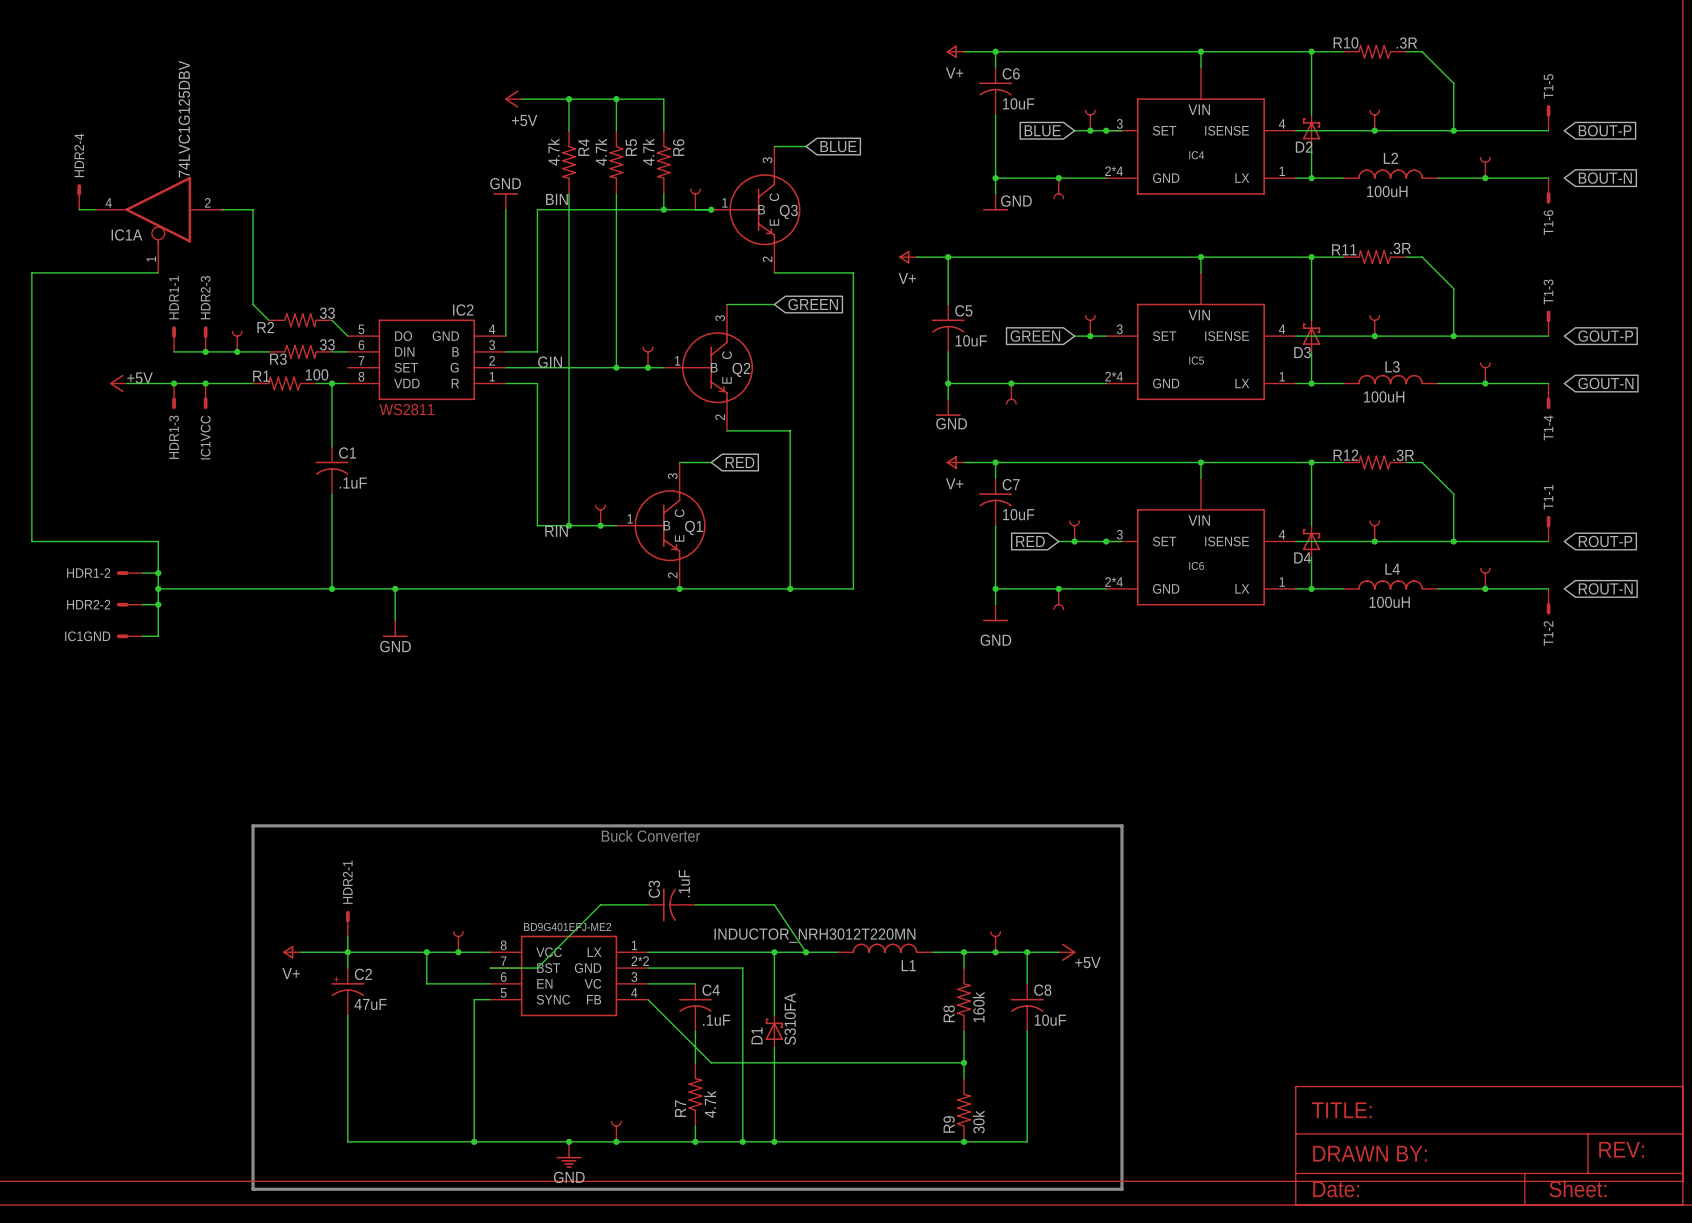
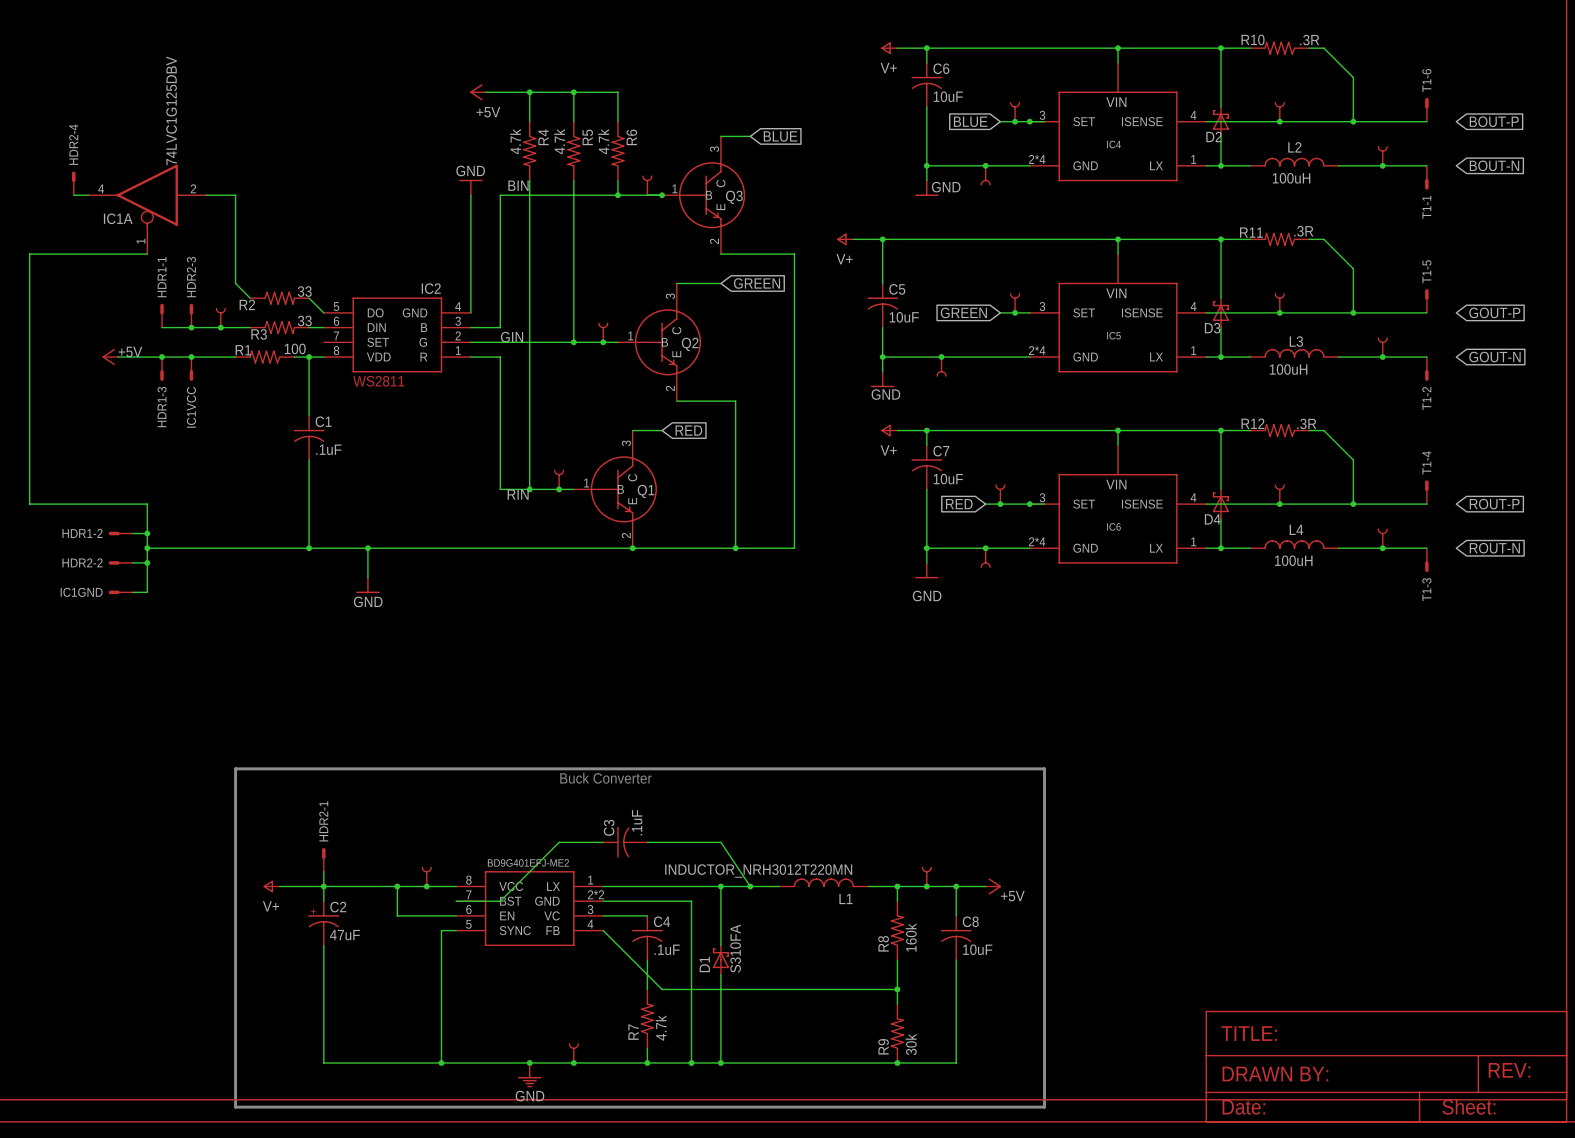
T1-5 position: (1548, 117) -> (1426, 300)
wire: (1532, 130) (1548, 130) -> none
wire: (1532, 178) (1548, 178) -> none
T1-6 position: (1548, 190) -> (1426, 109)
T1-6 rotation: 0° (1548, 197) -> 180° (1426, 103)
T1-3 rotation: 0° (1548, 316) -> 180° (1426, 566)
T1-3 position: (1548, 323) -> (1426, 560)
wire: (1532, 336) (1548, 336) -> none
wire: (1532, 383) (1548, 383) -> none
T1-4 position: (1548, 396) -> (1426, 492)
T1-4 rotation: 0° (1548, 403) -> 180° (1426, 485)
T1-1 rotation: 0° (1548, 521) -> 180° (1426, 184)
T1-1 position: (1548, 528) -> (1426, 177)
wire: (1532, 541) (1548, 541) -> none
wire: (1532, 588) (1548, 588) -> none
T1-2 position: (1548, 601) -> (1426, 368)

